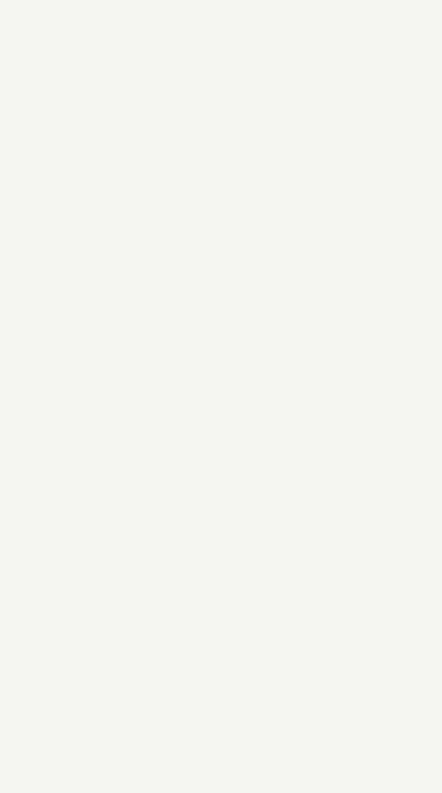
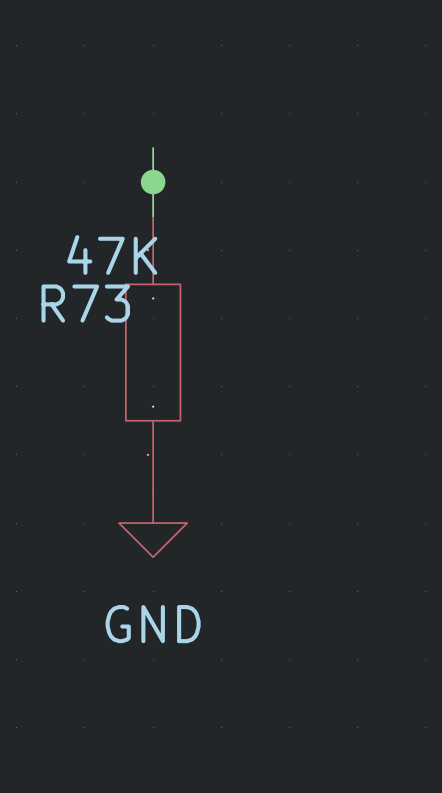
wire: none -> (153, 147) (153, 216)
junction: none -> (153, 182)
R73: none -> 47K (153, 352)
power symbol: none -> GND (153, 523)

